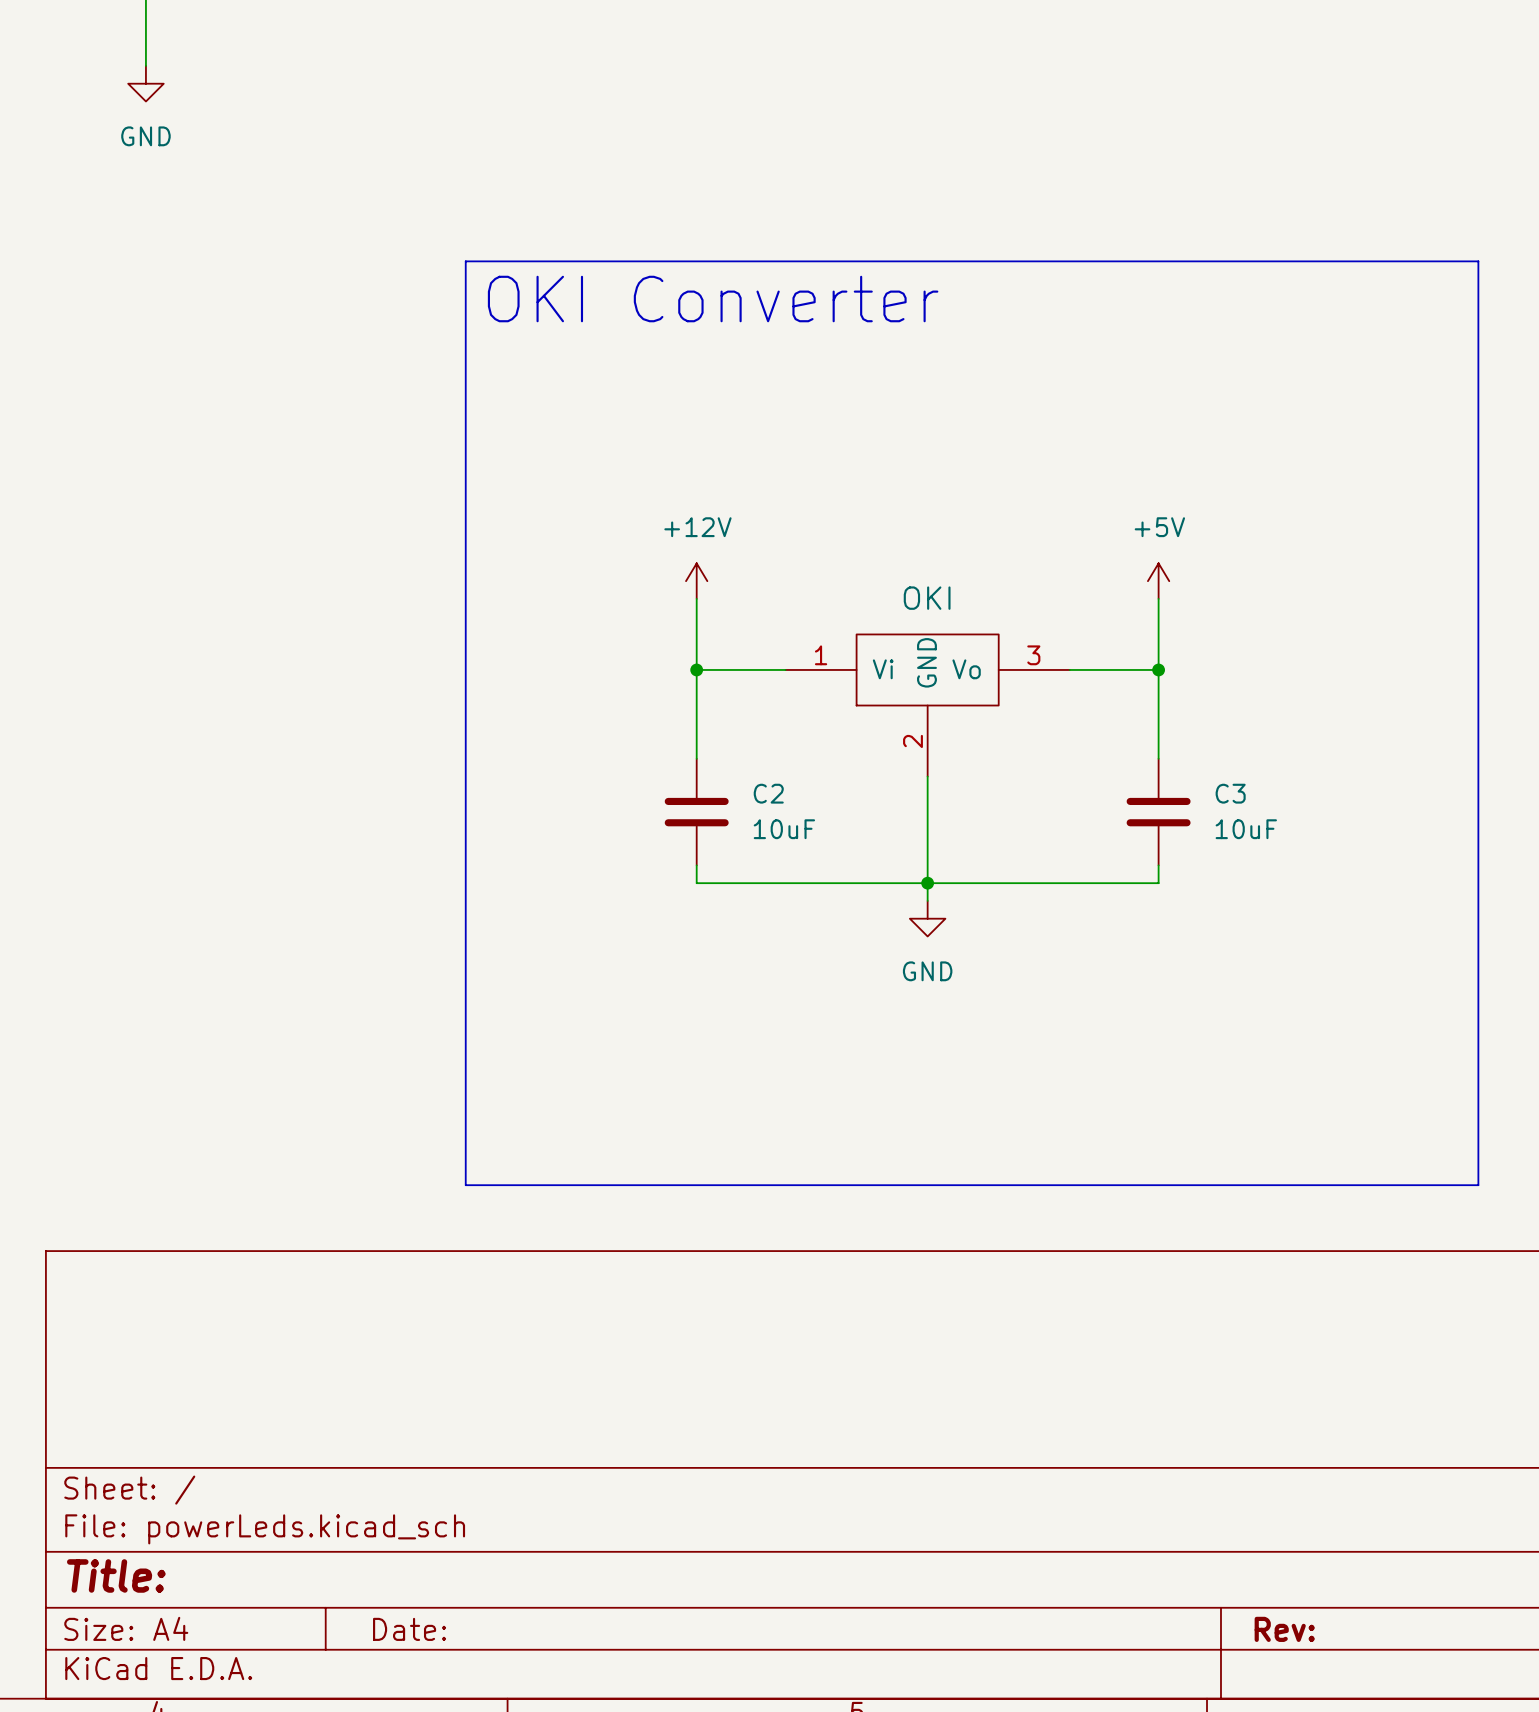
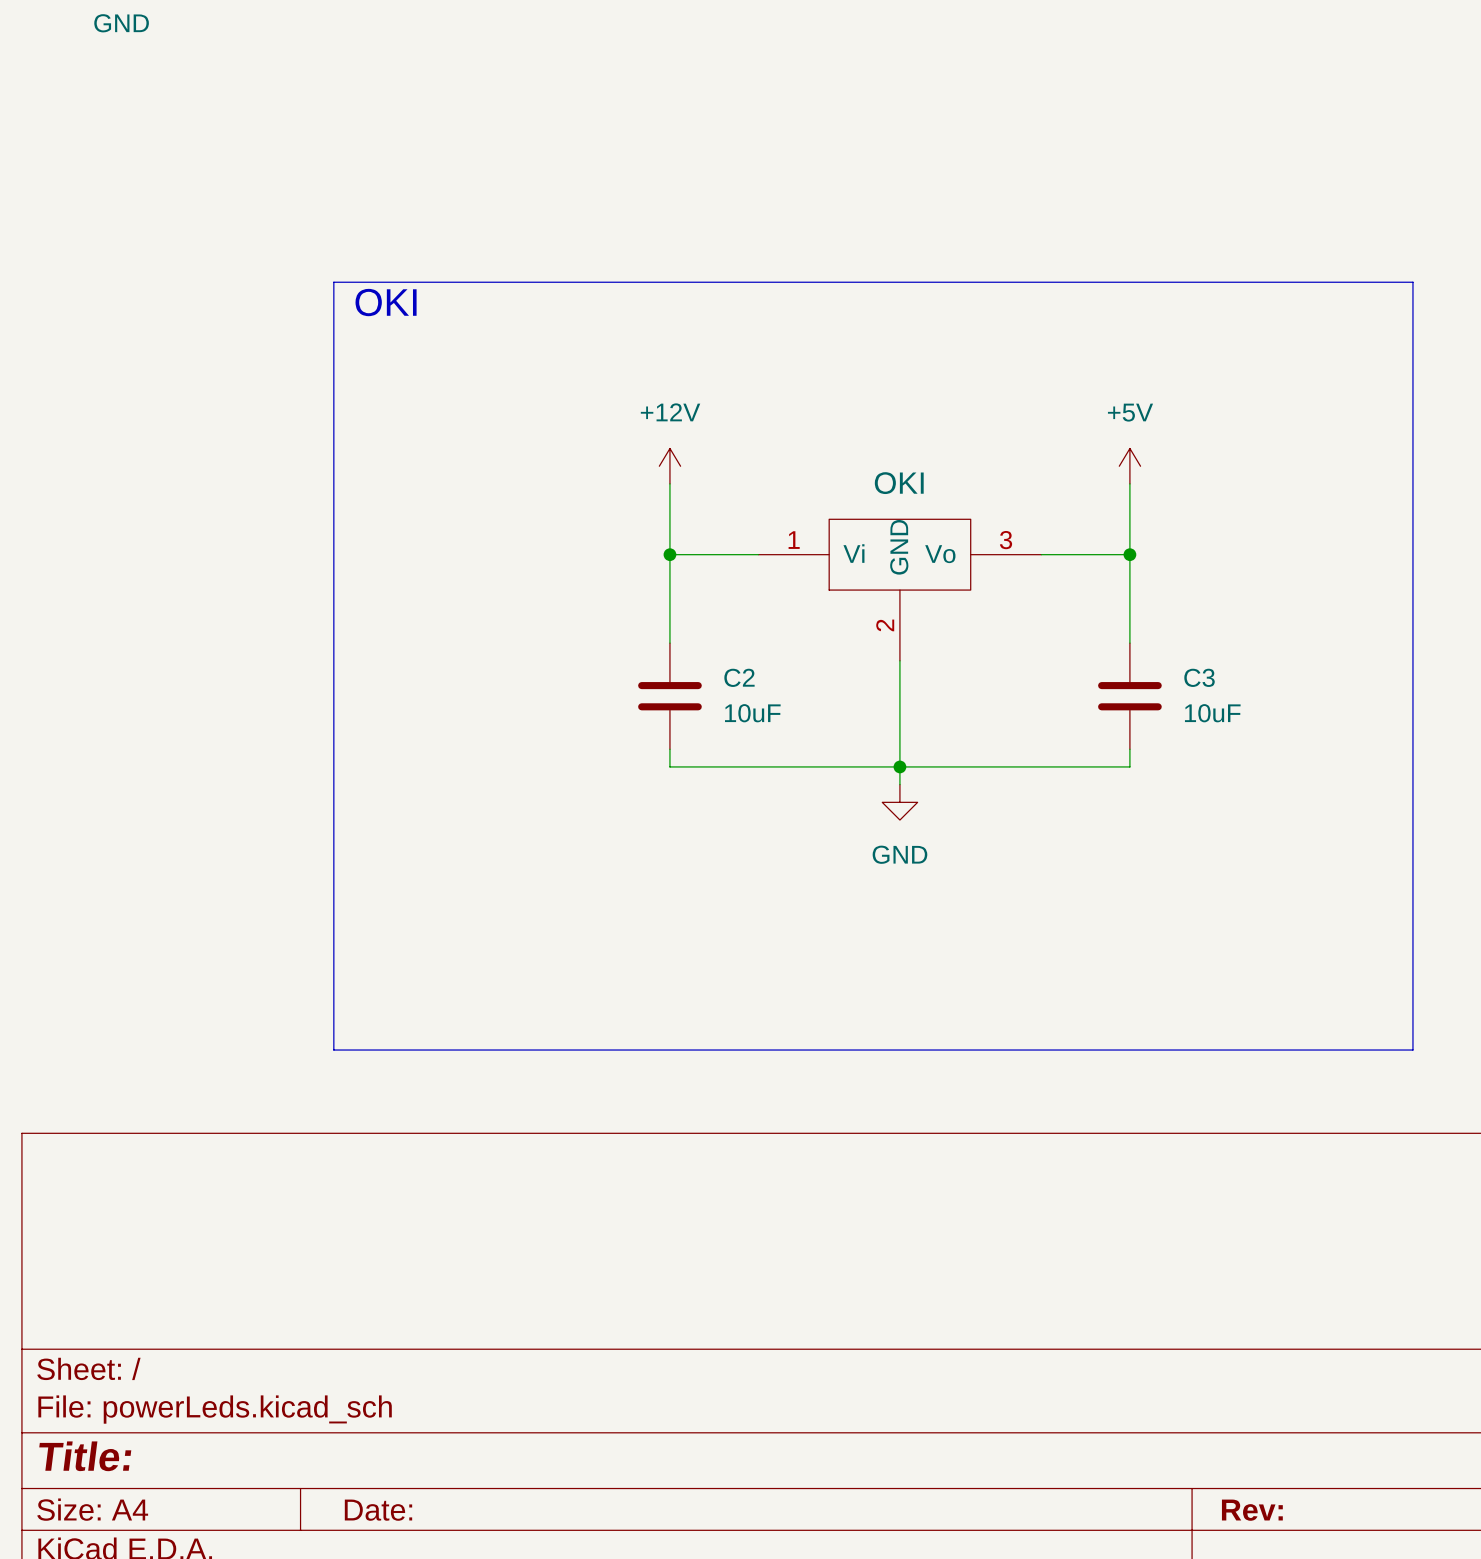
line: (465, 261) (1478, 261) (1478, 1185) (465, 1185) (465, 261) -> (333, 282) (333, 1050) (1412, 1050) (1412, 282) (333, 282)
text: OKI Converter (713, 299) -> none
text: none -> OKI (386, 302)

